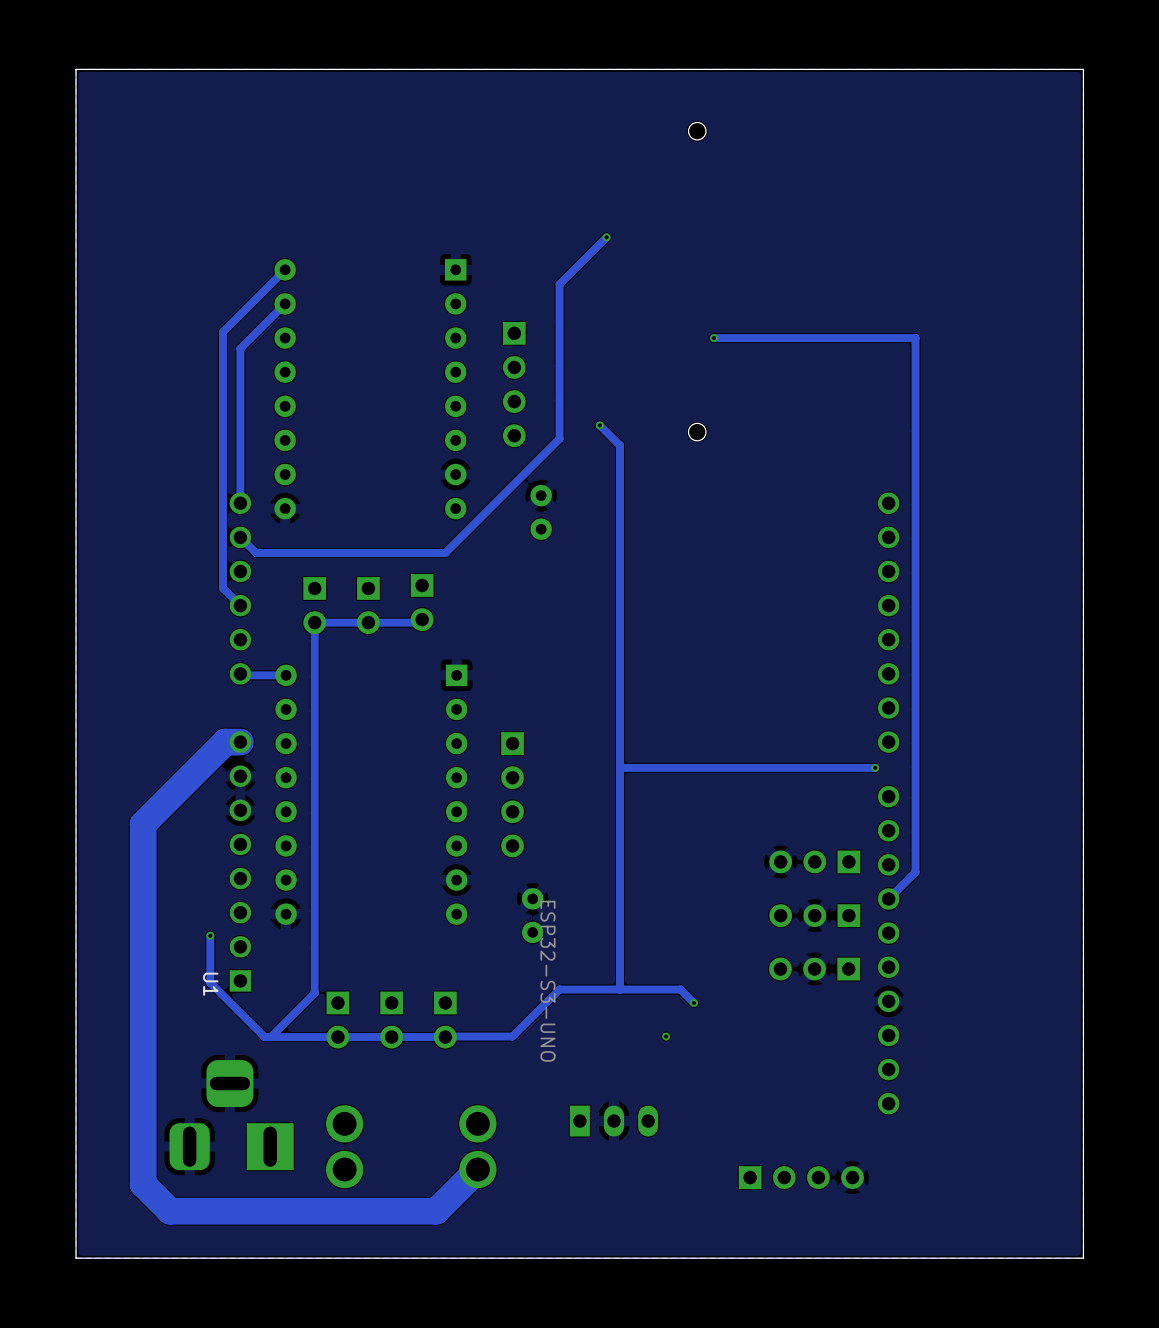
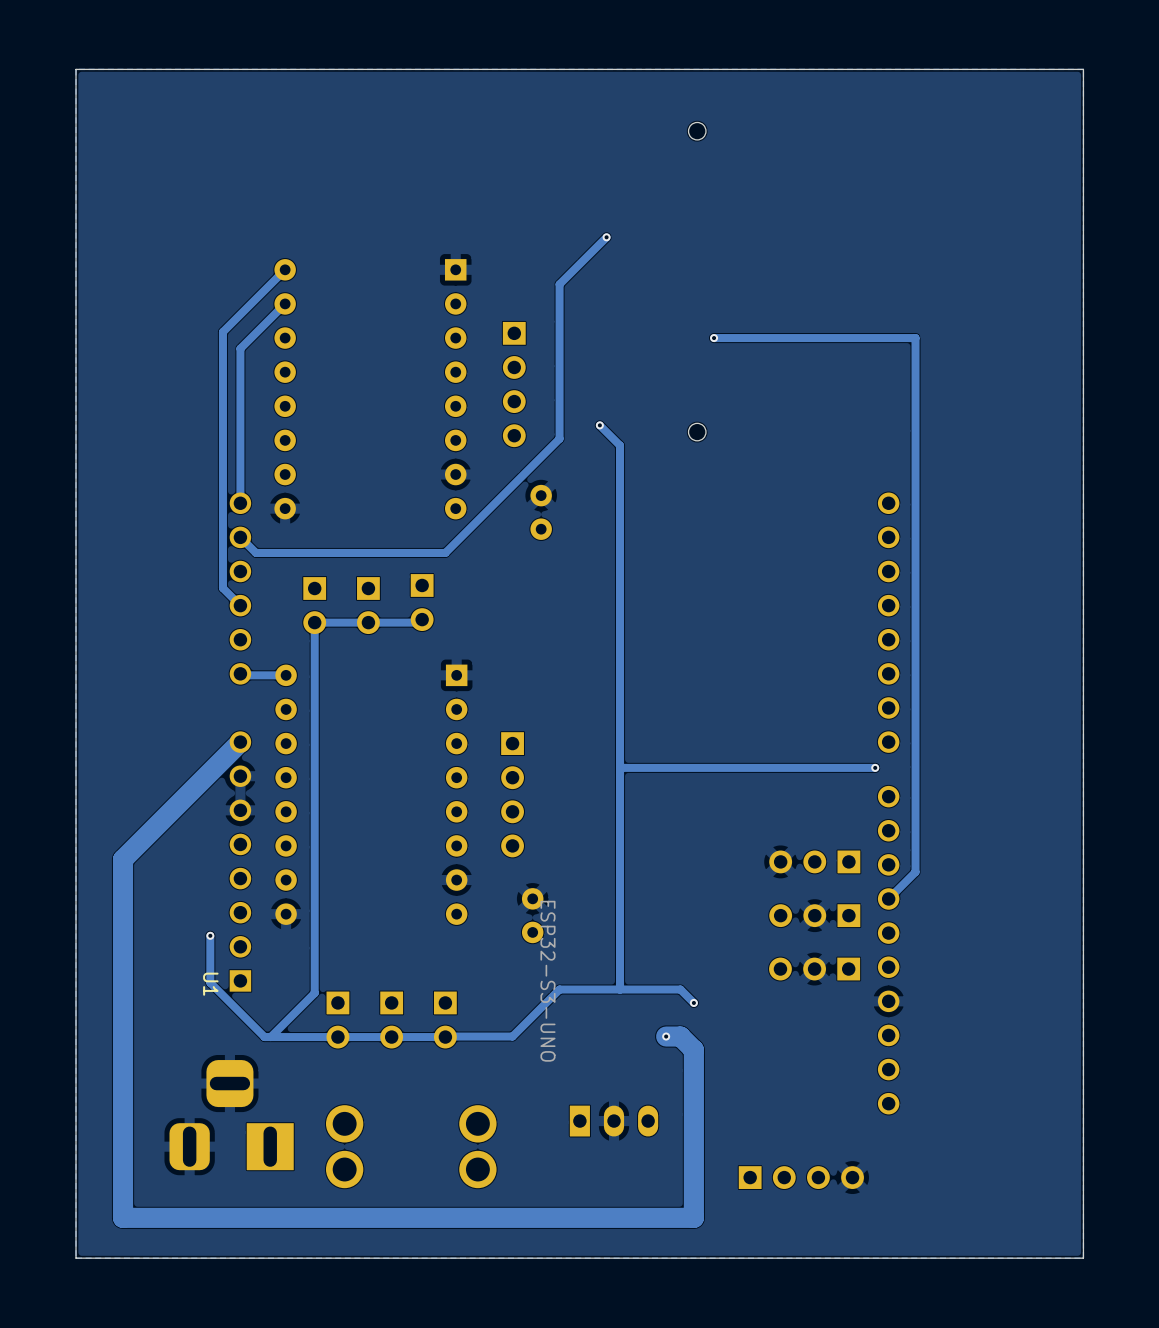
track: (240, 742) (225, 742) (143, 824) (143, 1184) (170, 1211) (436, 1211) (477, 1169) -> (240, 742) (123, 859) (123, 1217) (693, 1217) (693, 1049) (680, 1036) (666, 1036)

